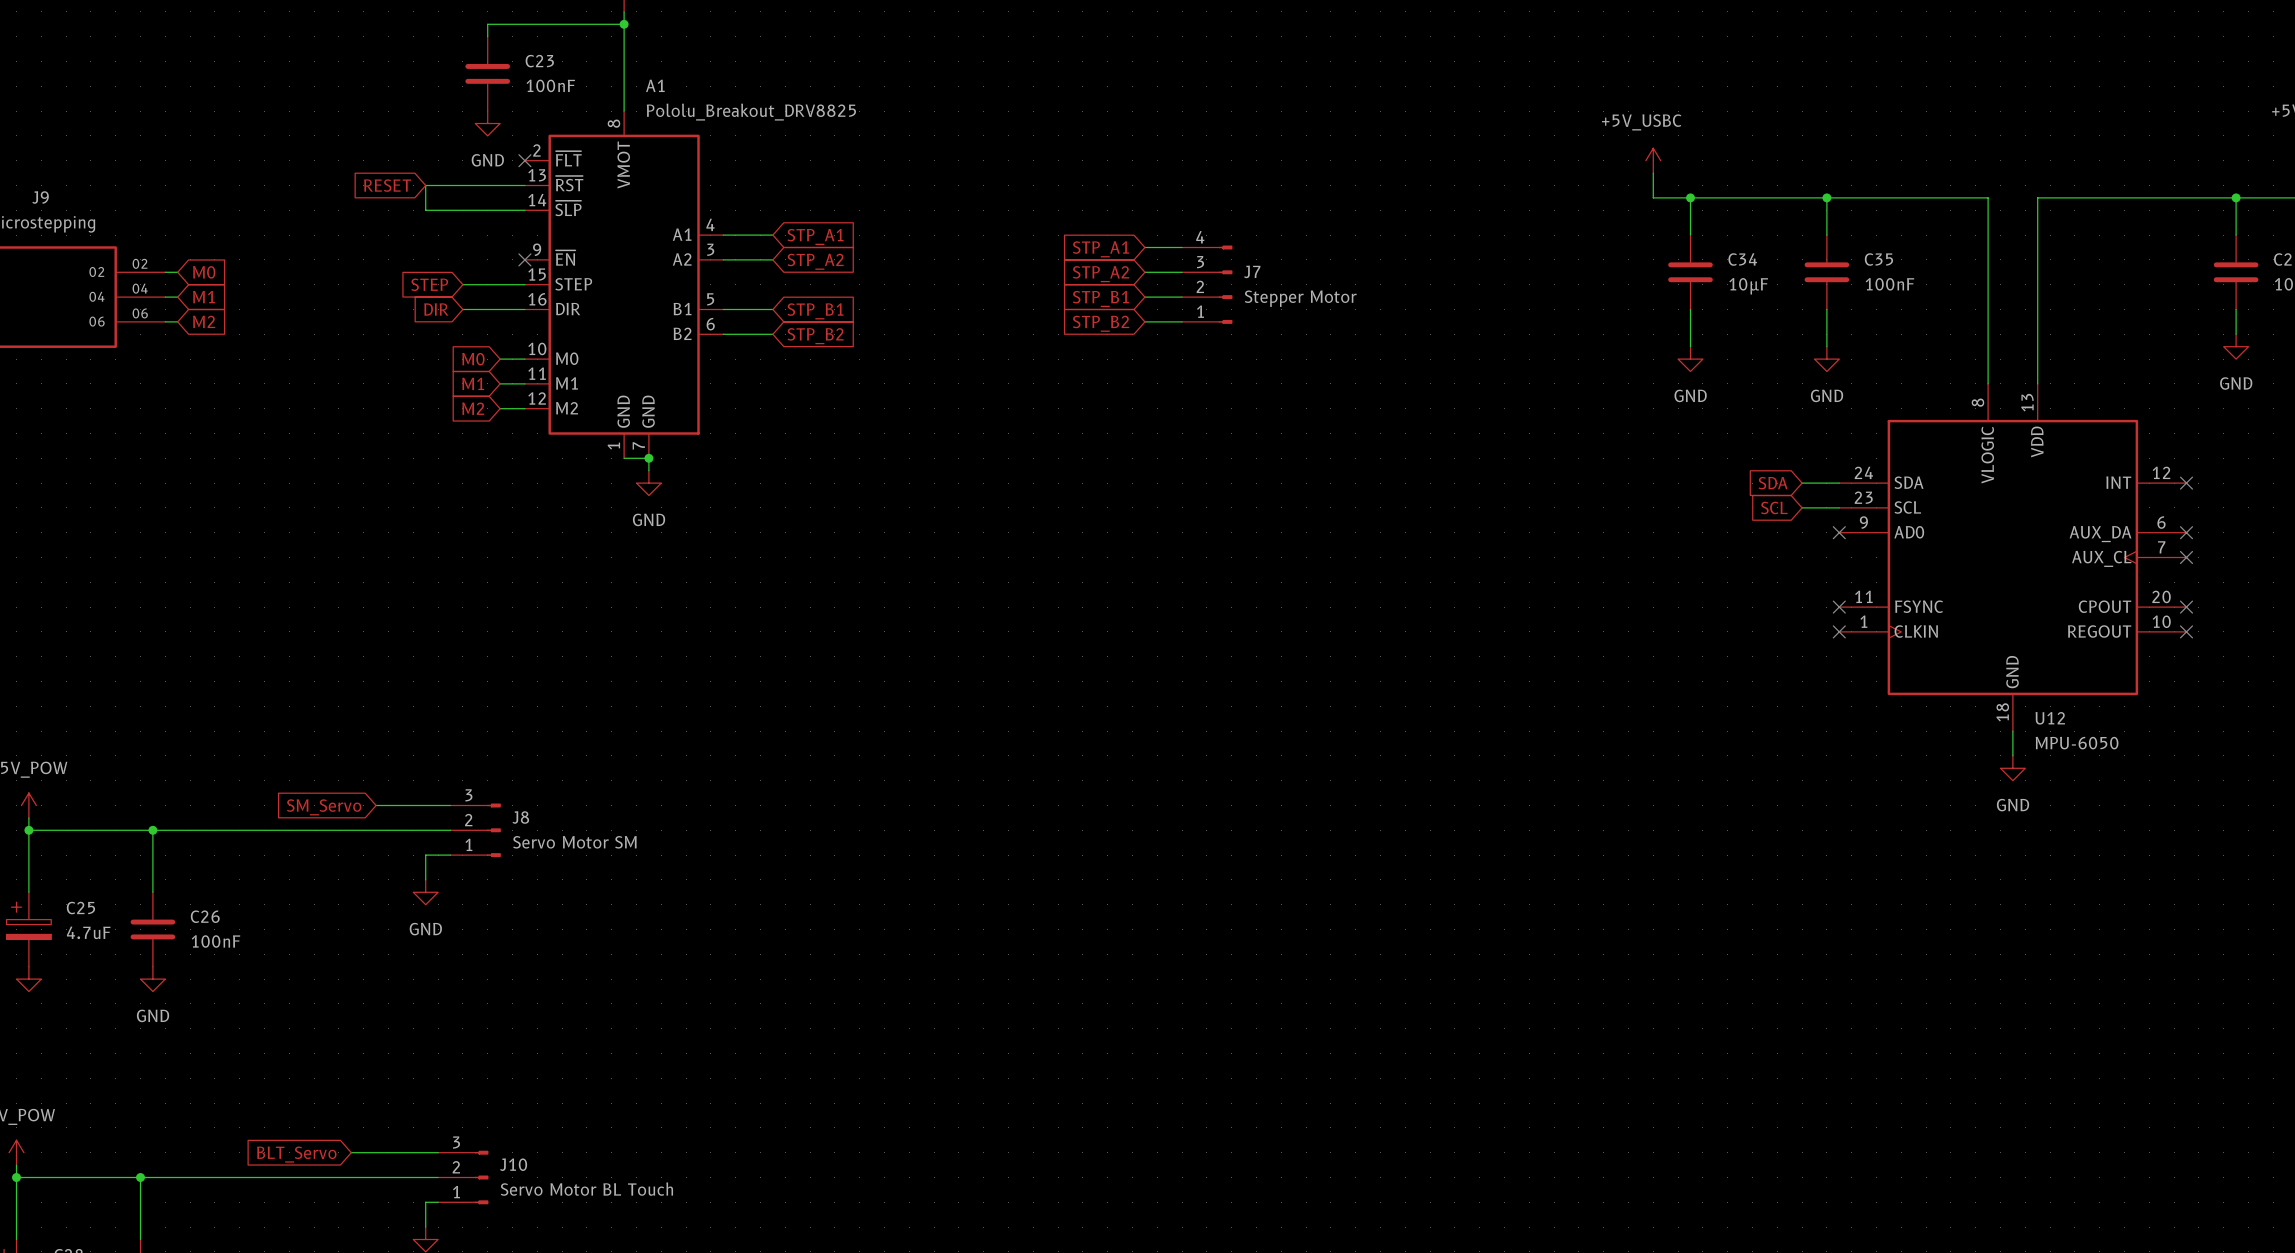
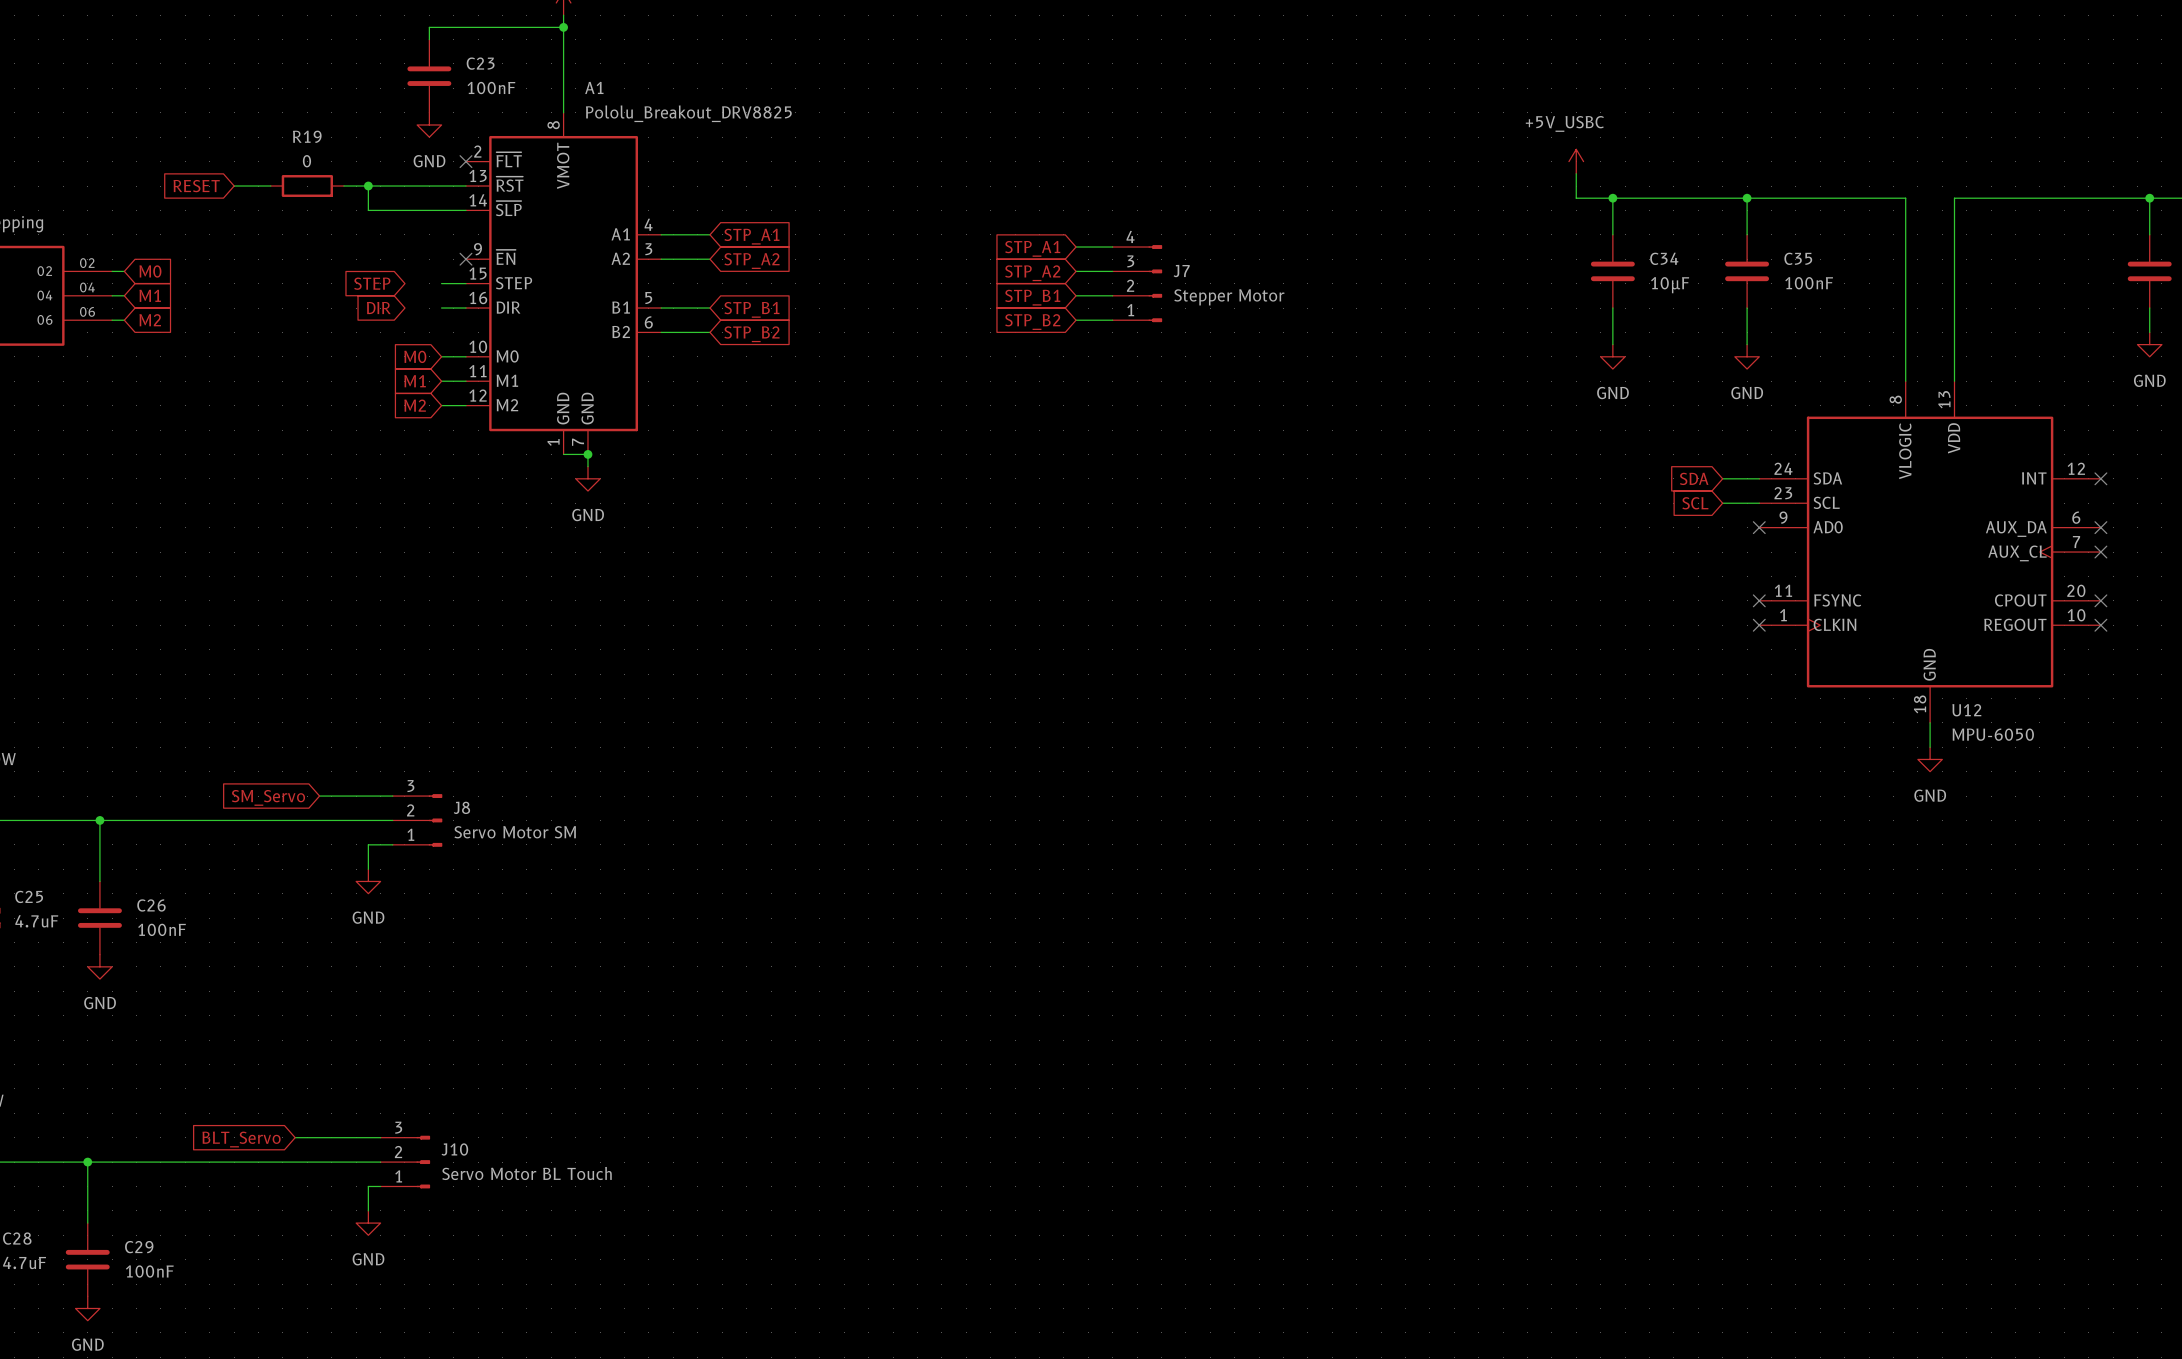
R19: none -> 0 (307, 186)
global label position: RESET (387, 185) -> RESET (196, 186)
wire: none -> (343, 186) (368, 186)
junction: none -> (368, 186)
wire: (462, 284) (500, 284) -> (234, 186) (270, 186)
wire: (462, 309) (500, 309) -> none

